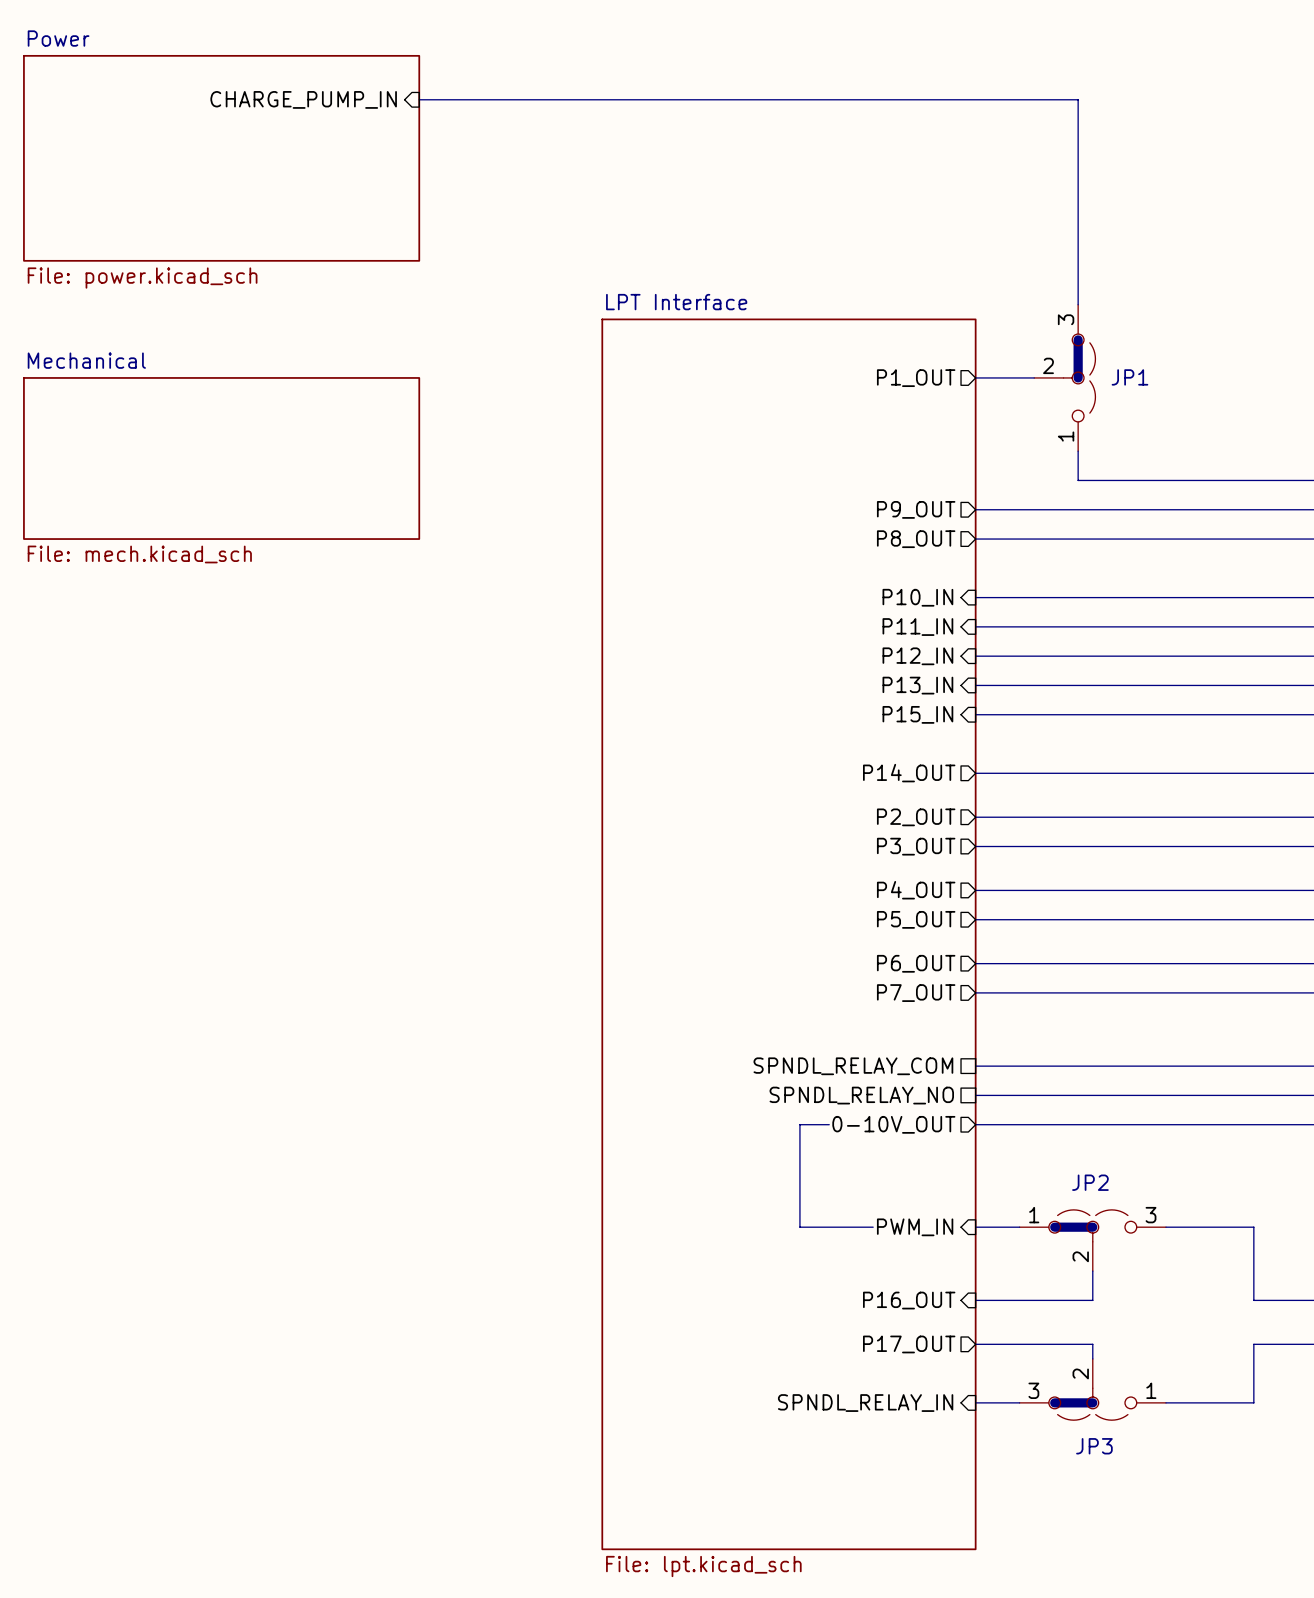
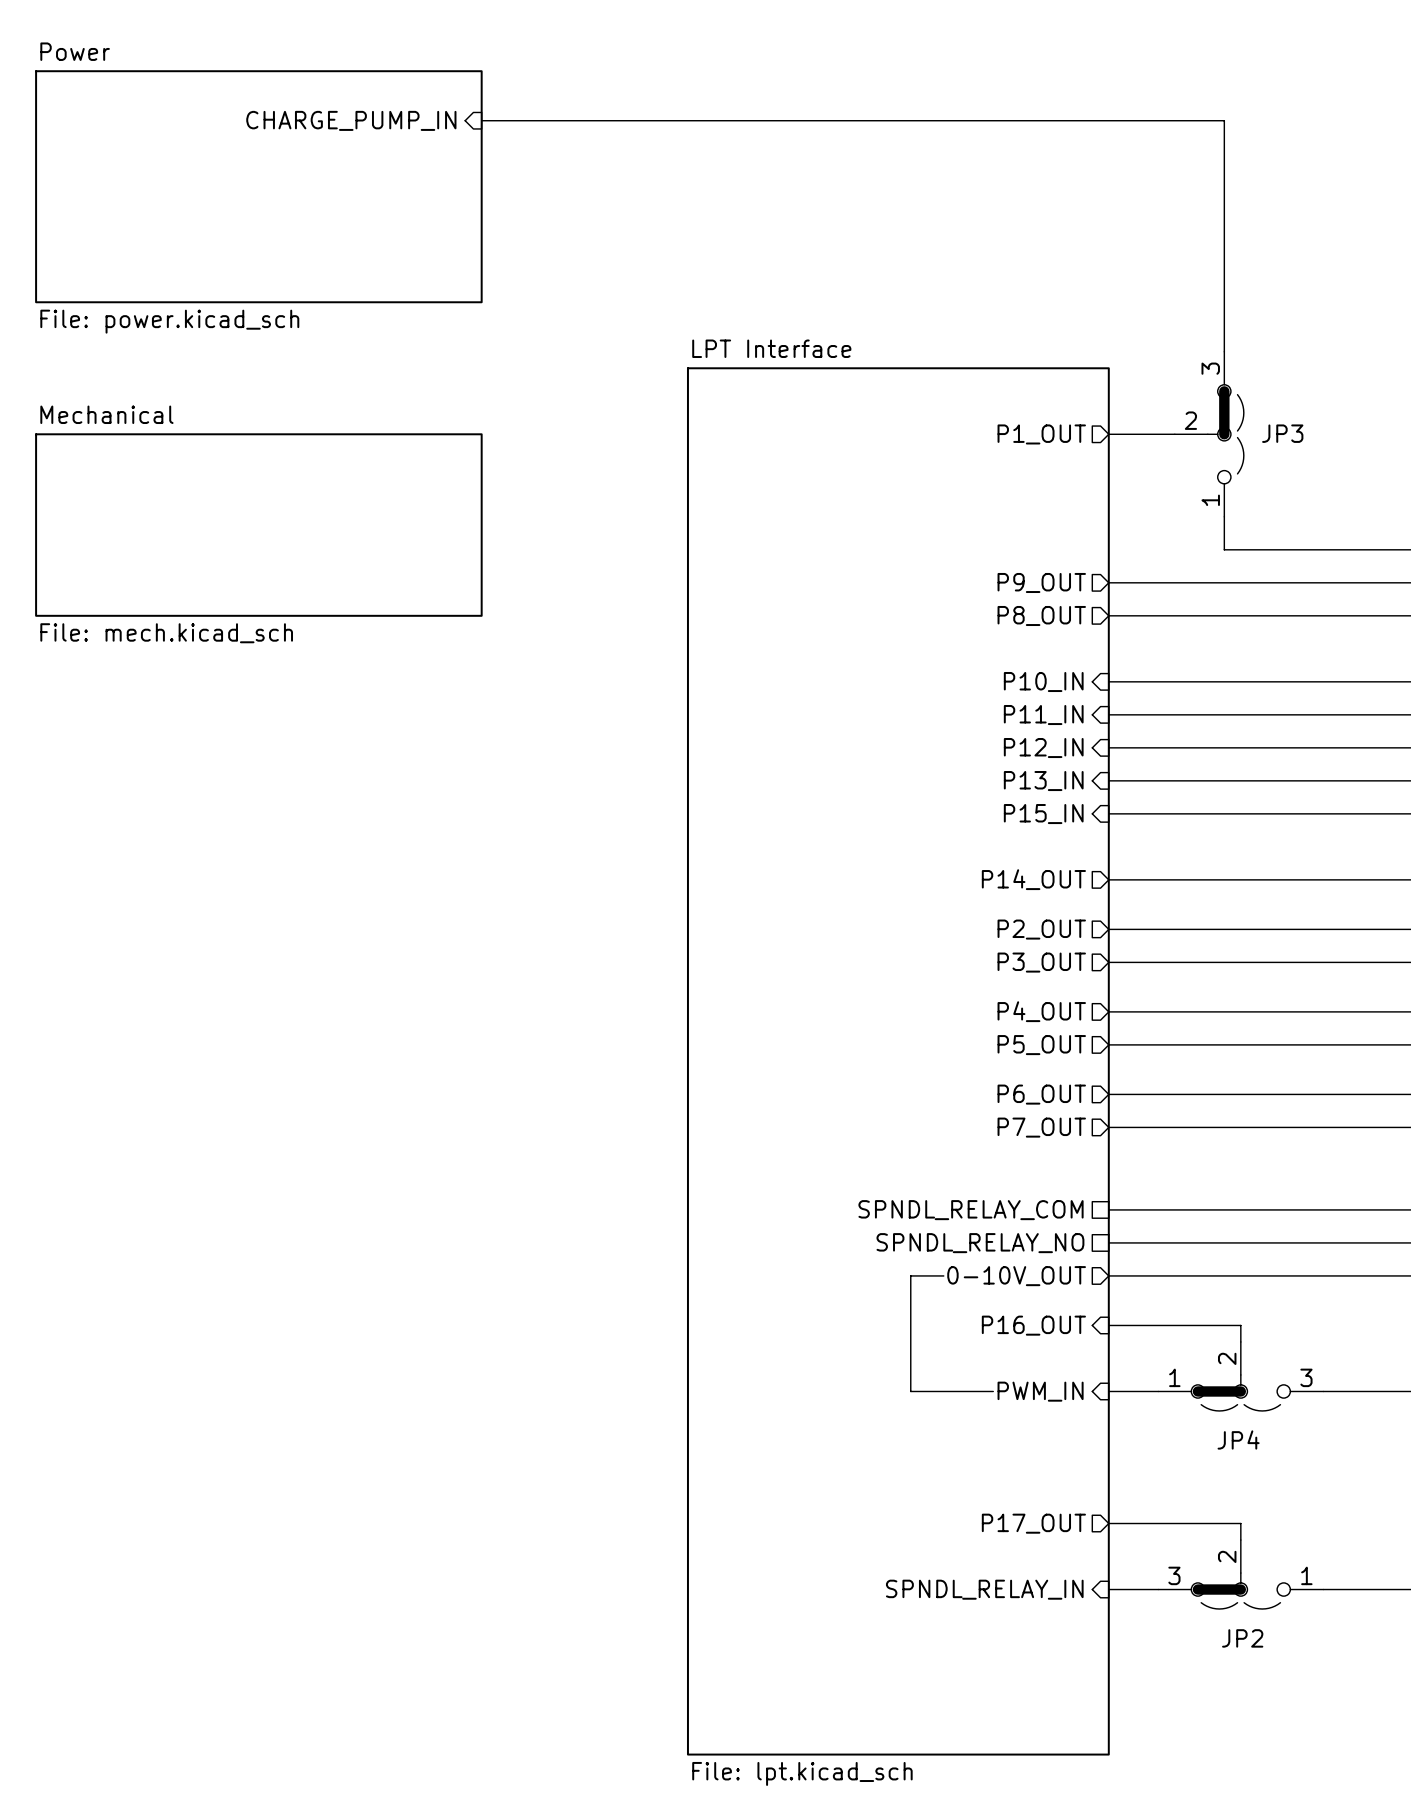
JP1 name: JP1 (1129, 377) -> JP3 (1282, 433)
wire: none -> (1108, 1325) (1240, 1325) (1240, 1341)
JP4: none -> (1240, 1376)
JP2: (1092, 1240) -> none
wire: (1092, 1271) (1092, 1300) (975, 1300) -> none
sheet pin position: P16_OUT (909, 1300) -> P16_OUT (1033, 1325)
JP3 name: JP3 (1094, 1446) -> JP2 (1242, 1638)

